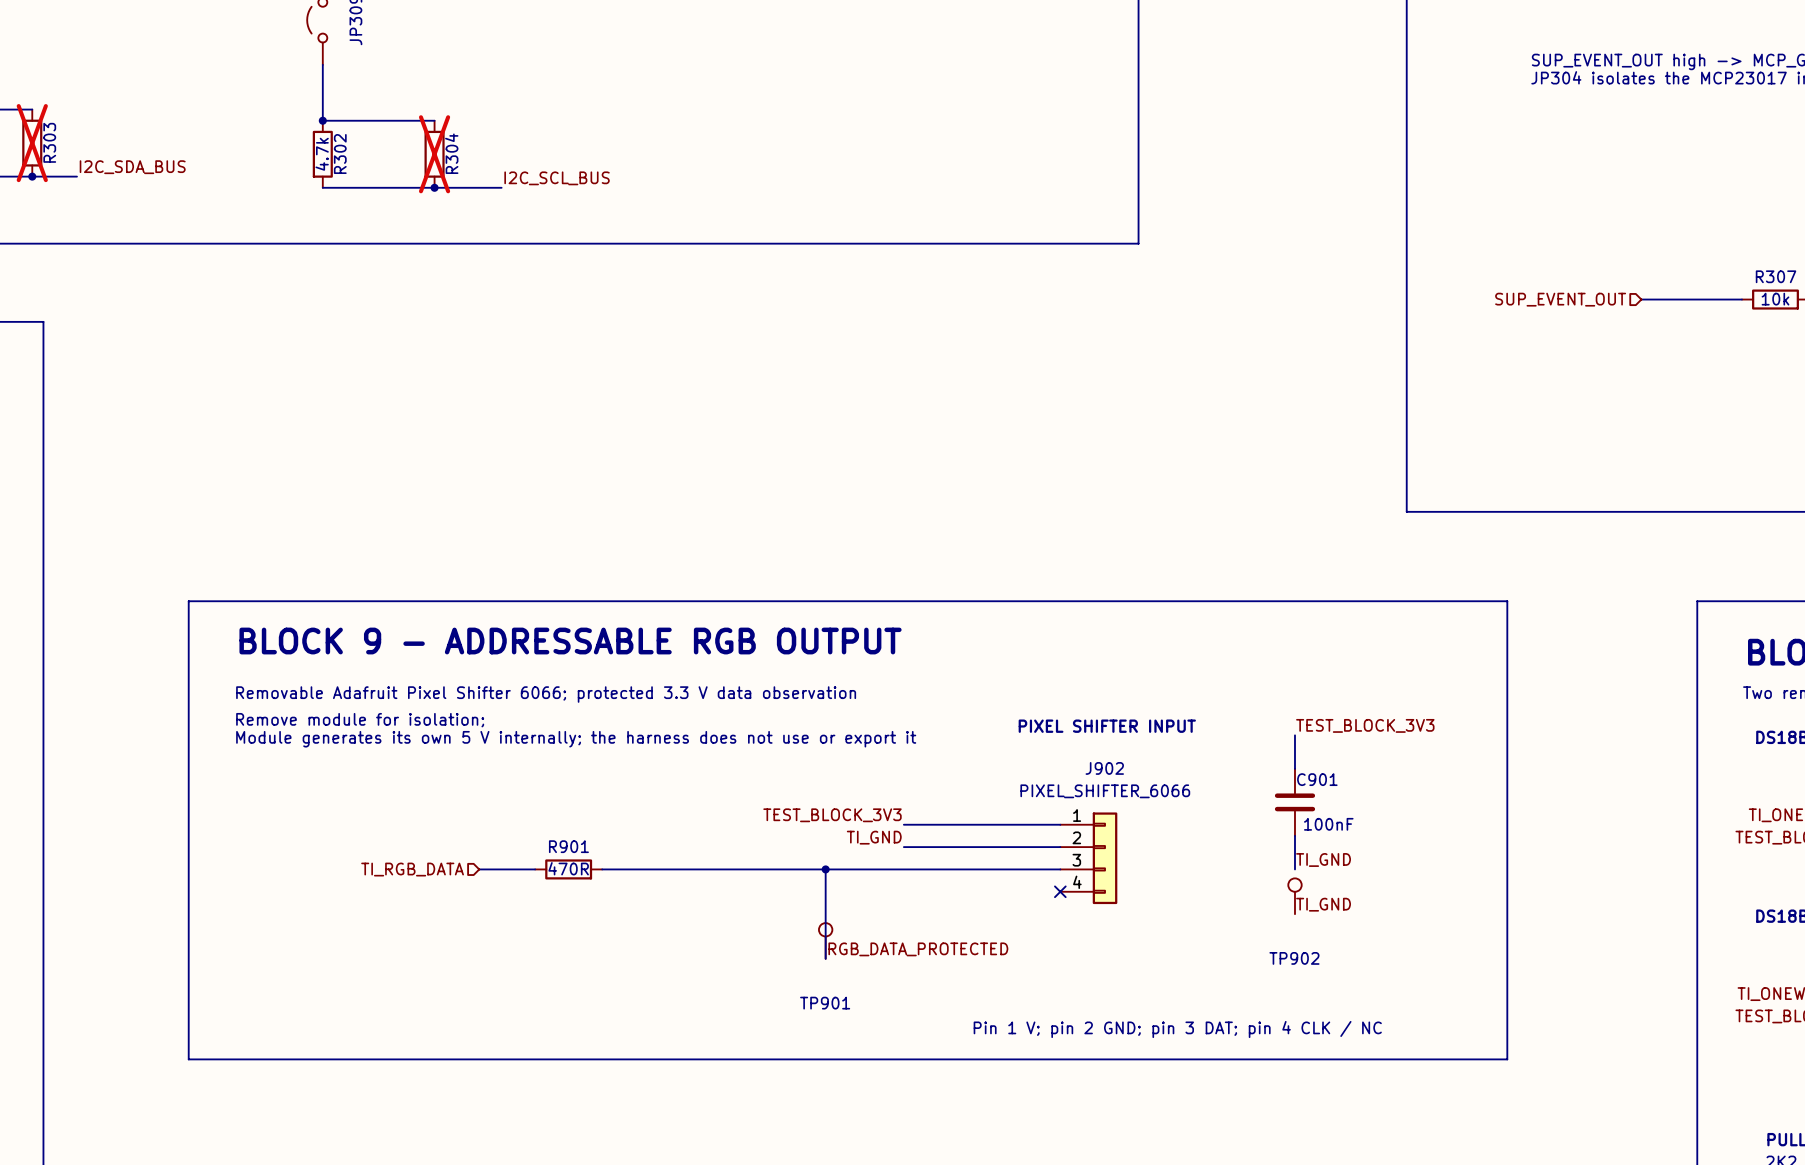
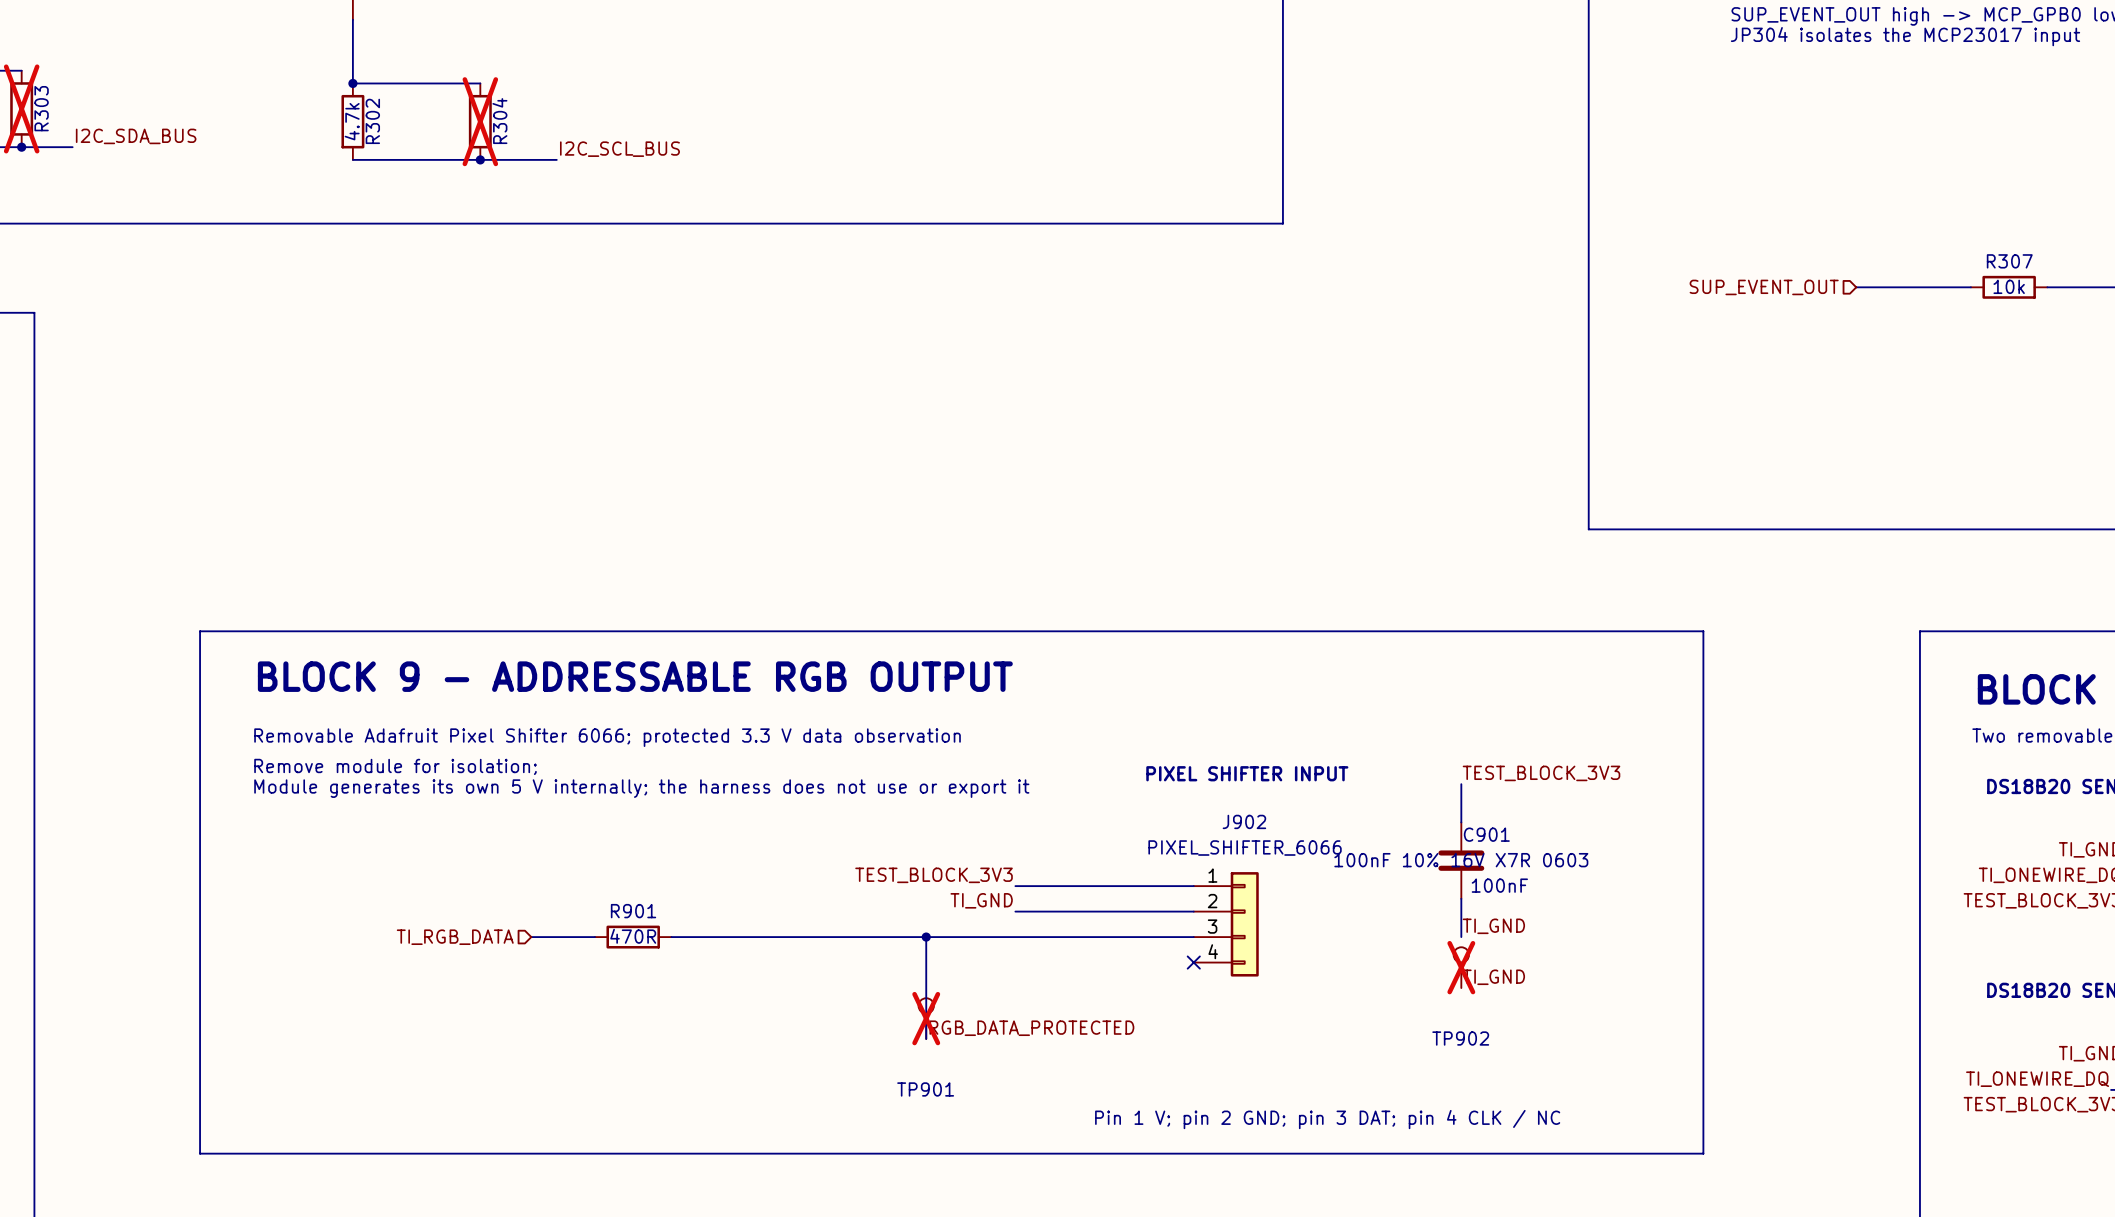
C901 text: none -> 100nF 10% 16V X7R 0603 (1461, 860)
TP902 do-not-place cross: none -> (1461, 967)
TP901 do-not-place cross: none -> (926, 1018)

